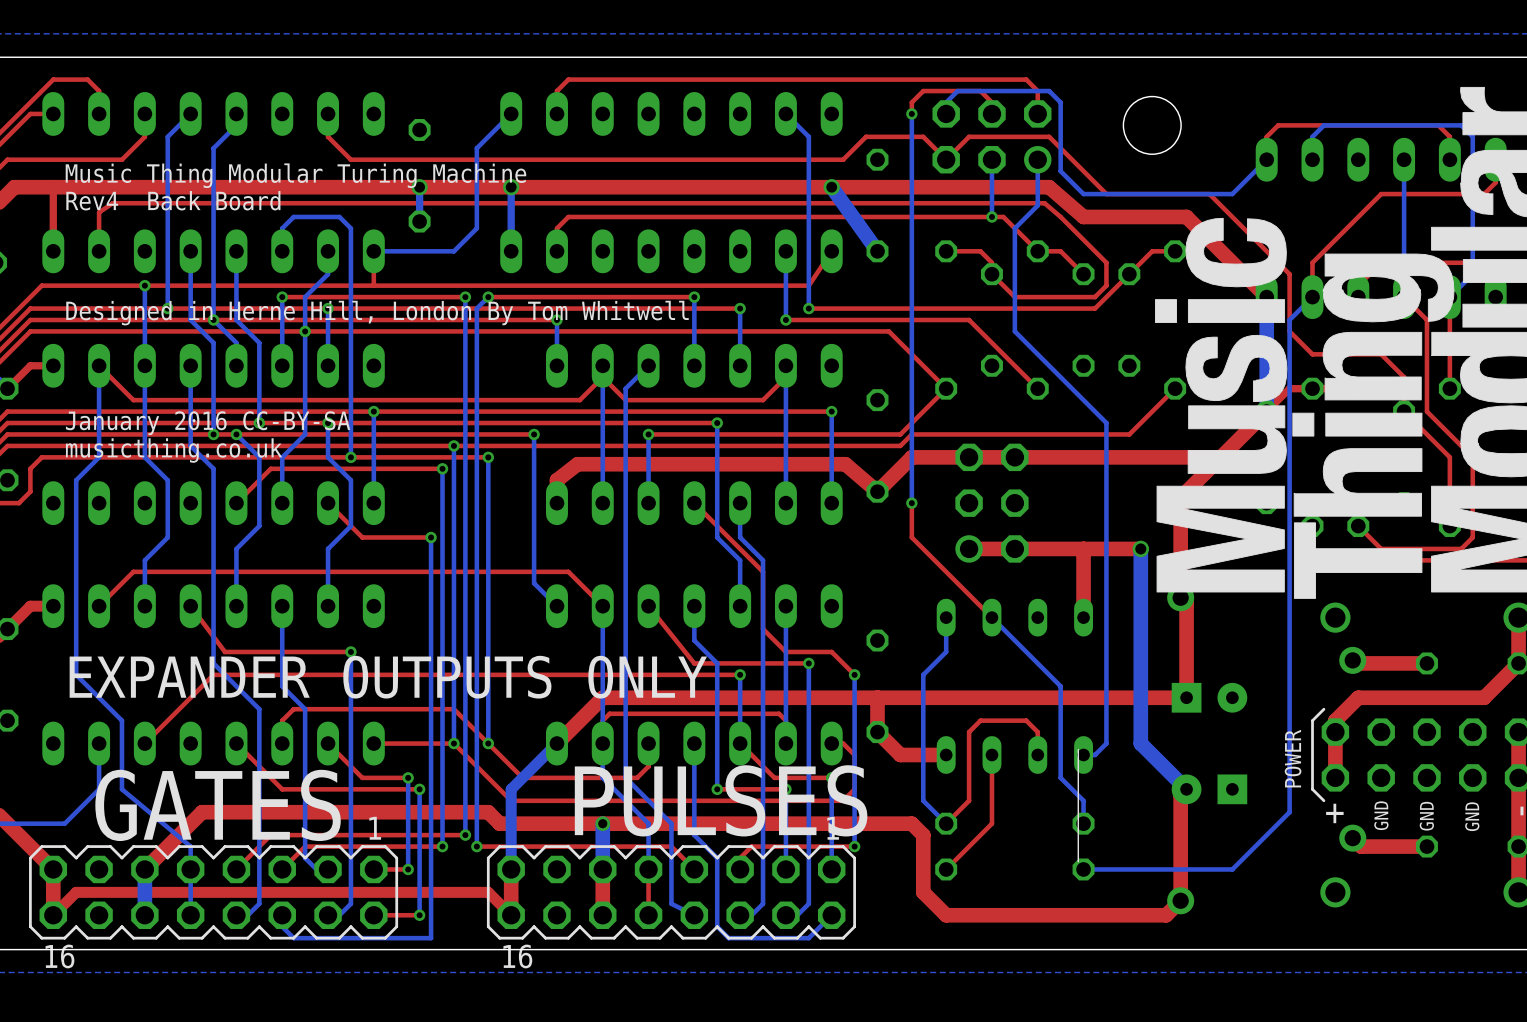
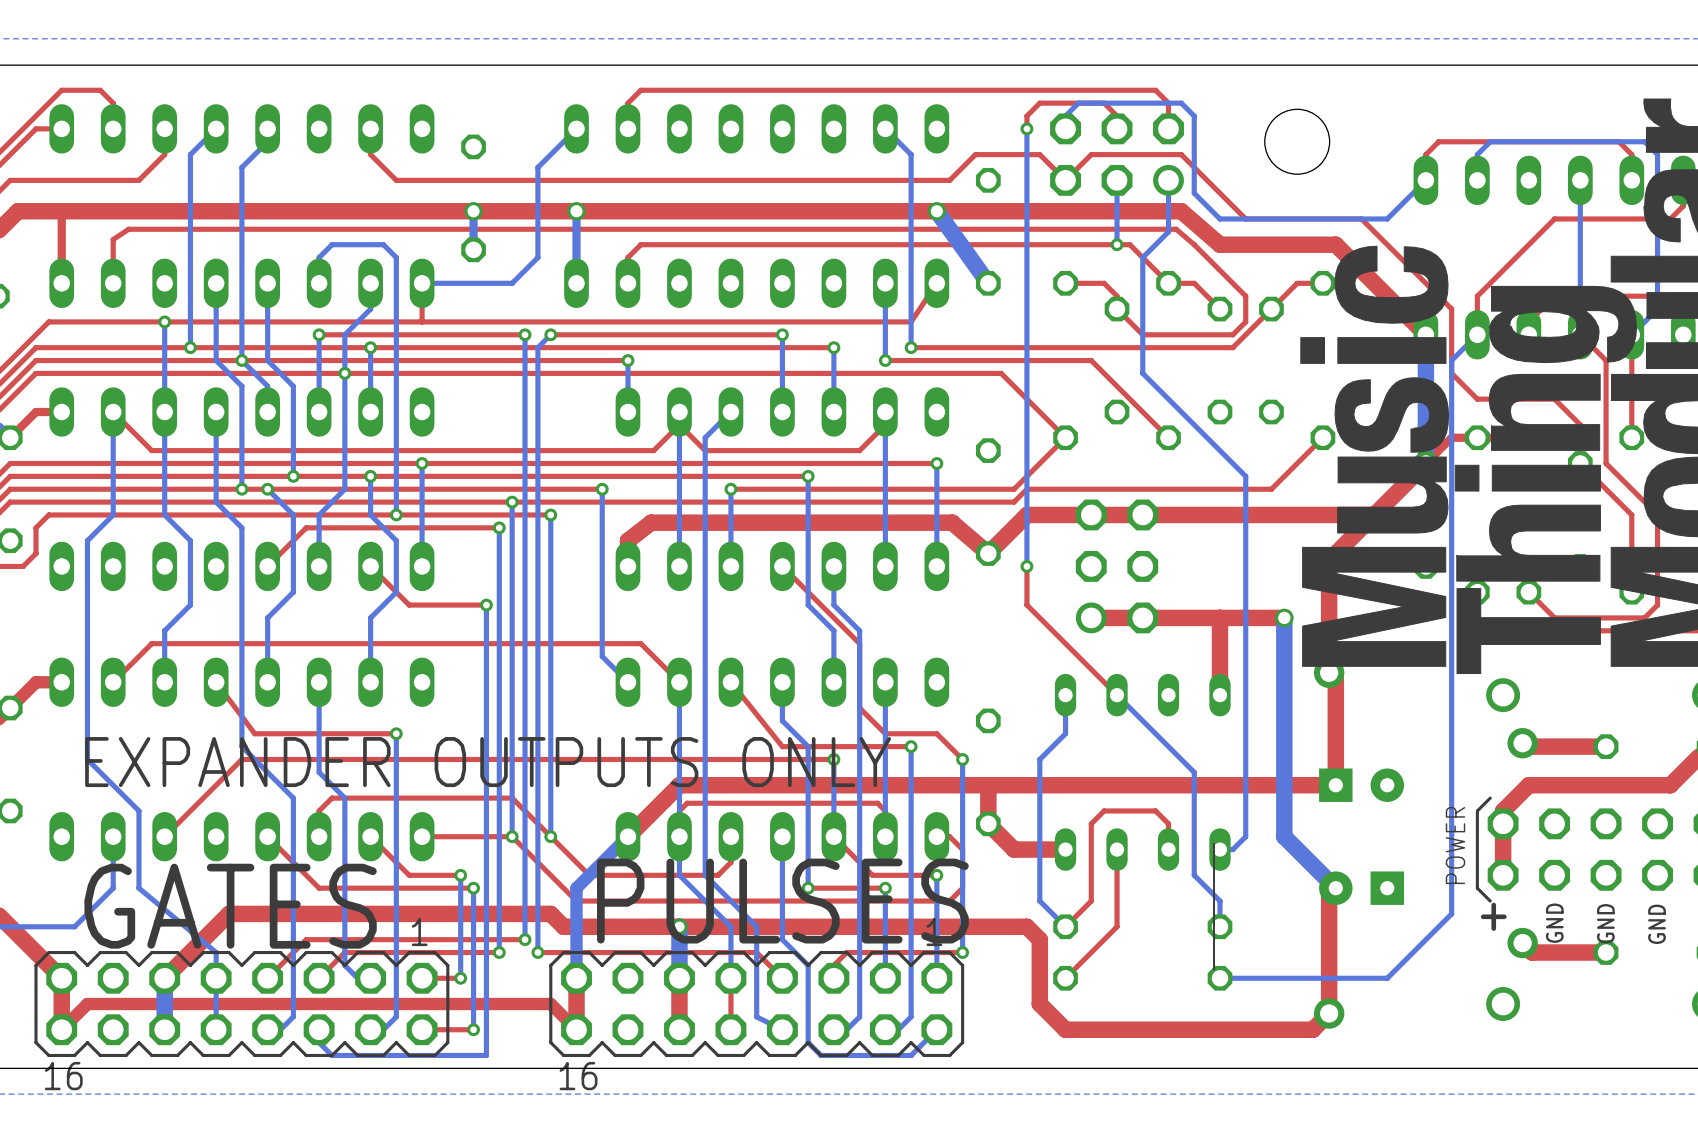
text: Music Thing Modular Turing Machine (295, 175) -> none
text: Rev4 Back Board (173, 200) -> none
text: Designed in Herne Hill, London By Tom Whitwell (377, 313) -> none
text: January 2016 CC-BY-SA (208, 423) -> none
text: musicthing.co.uk (174, 450) -> none

